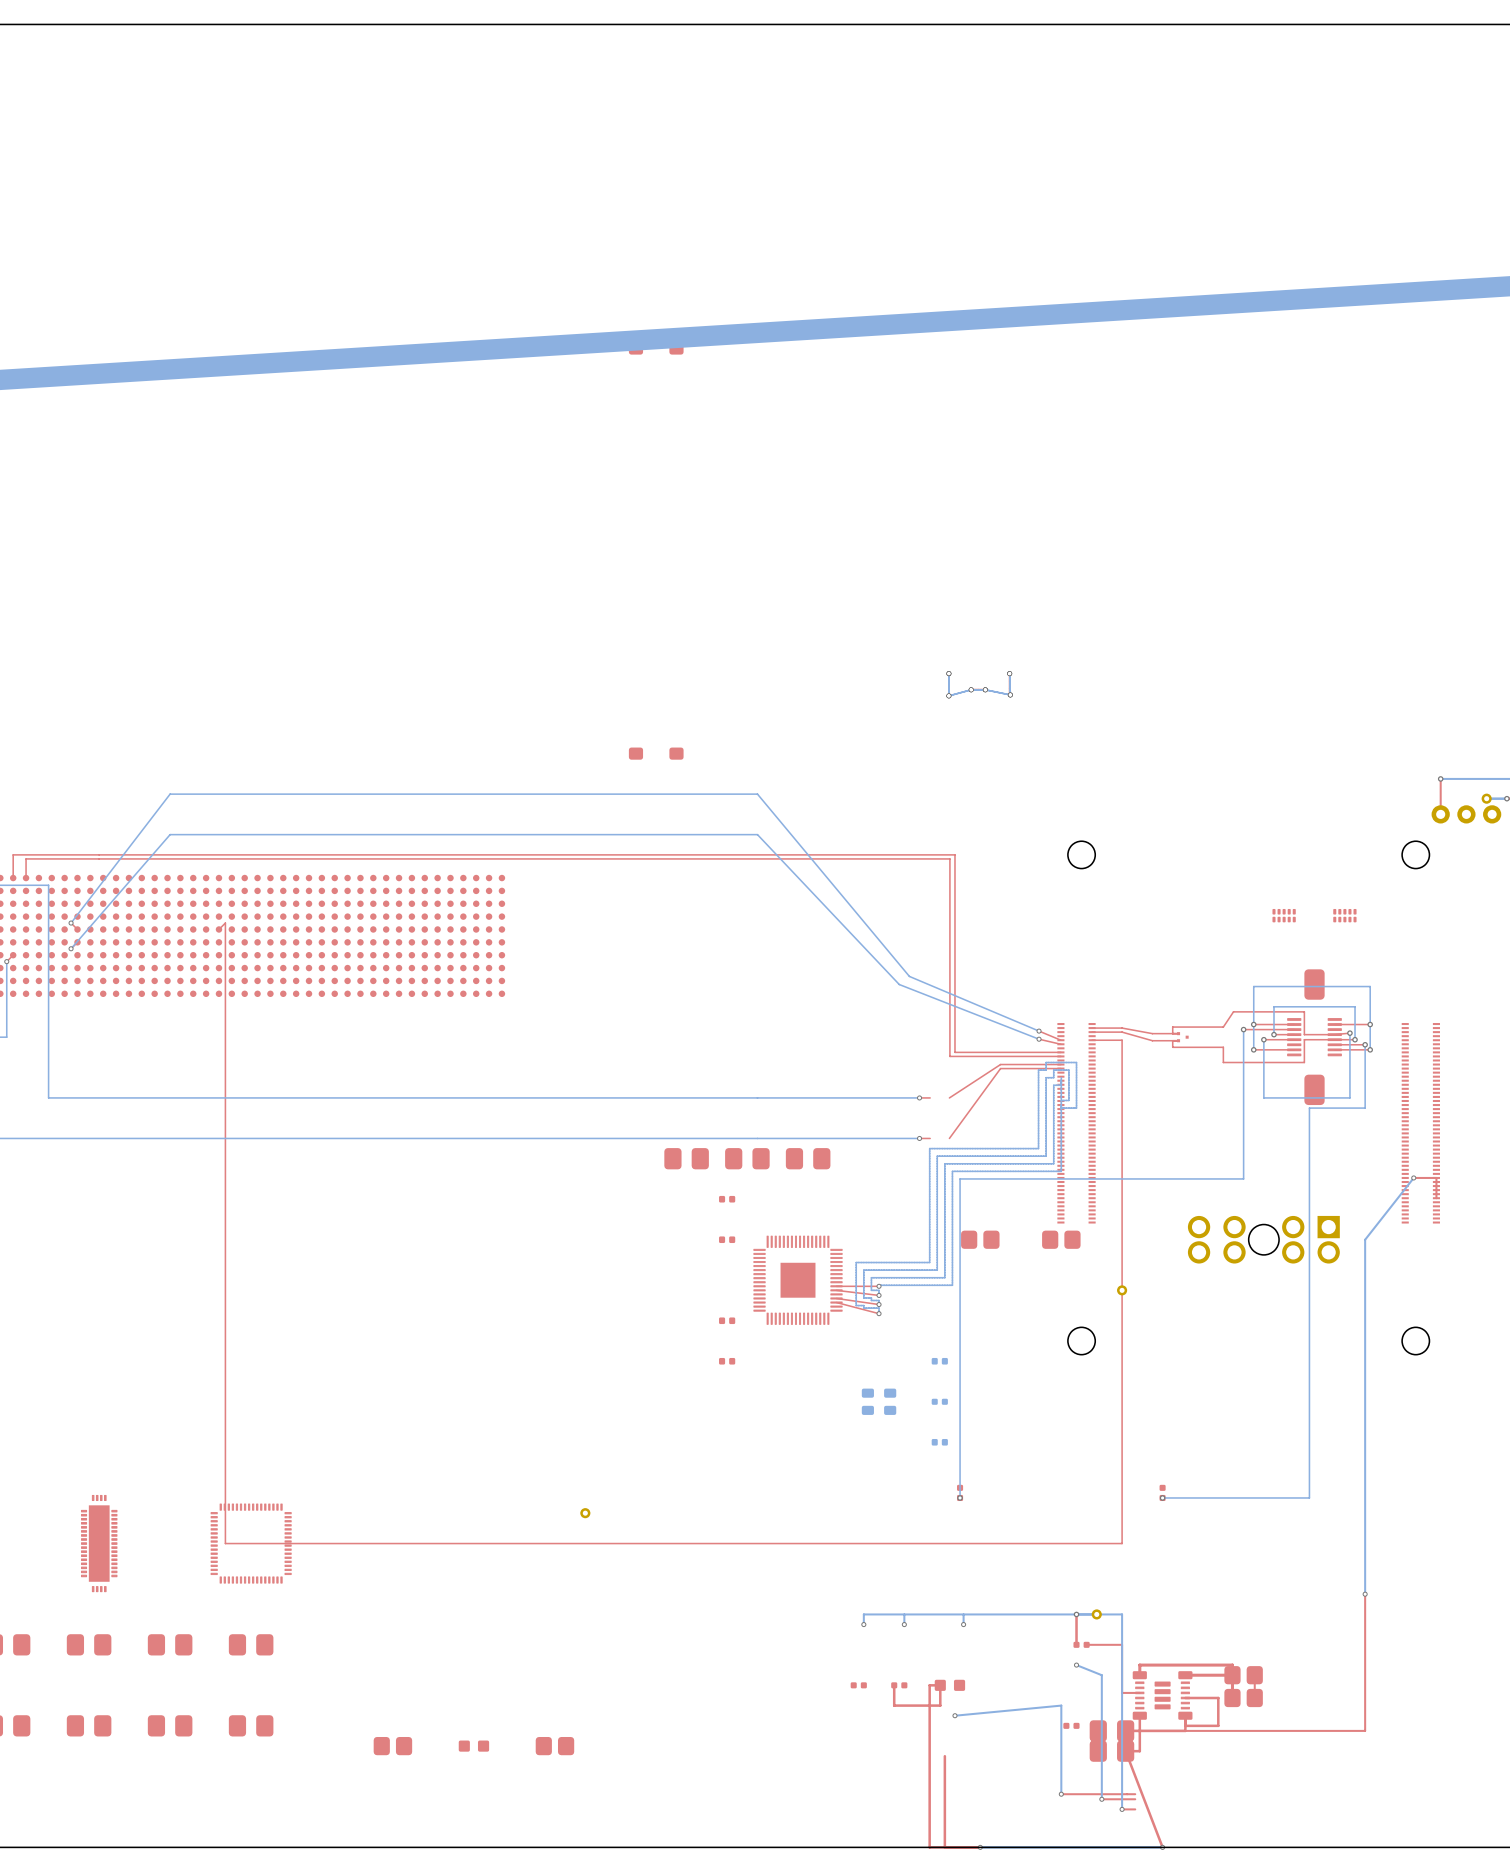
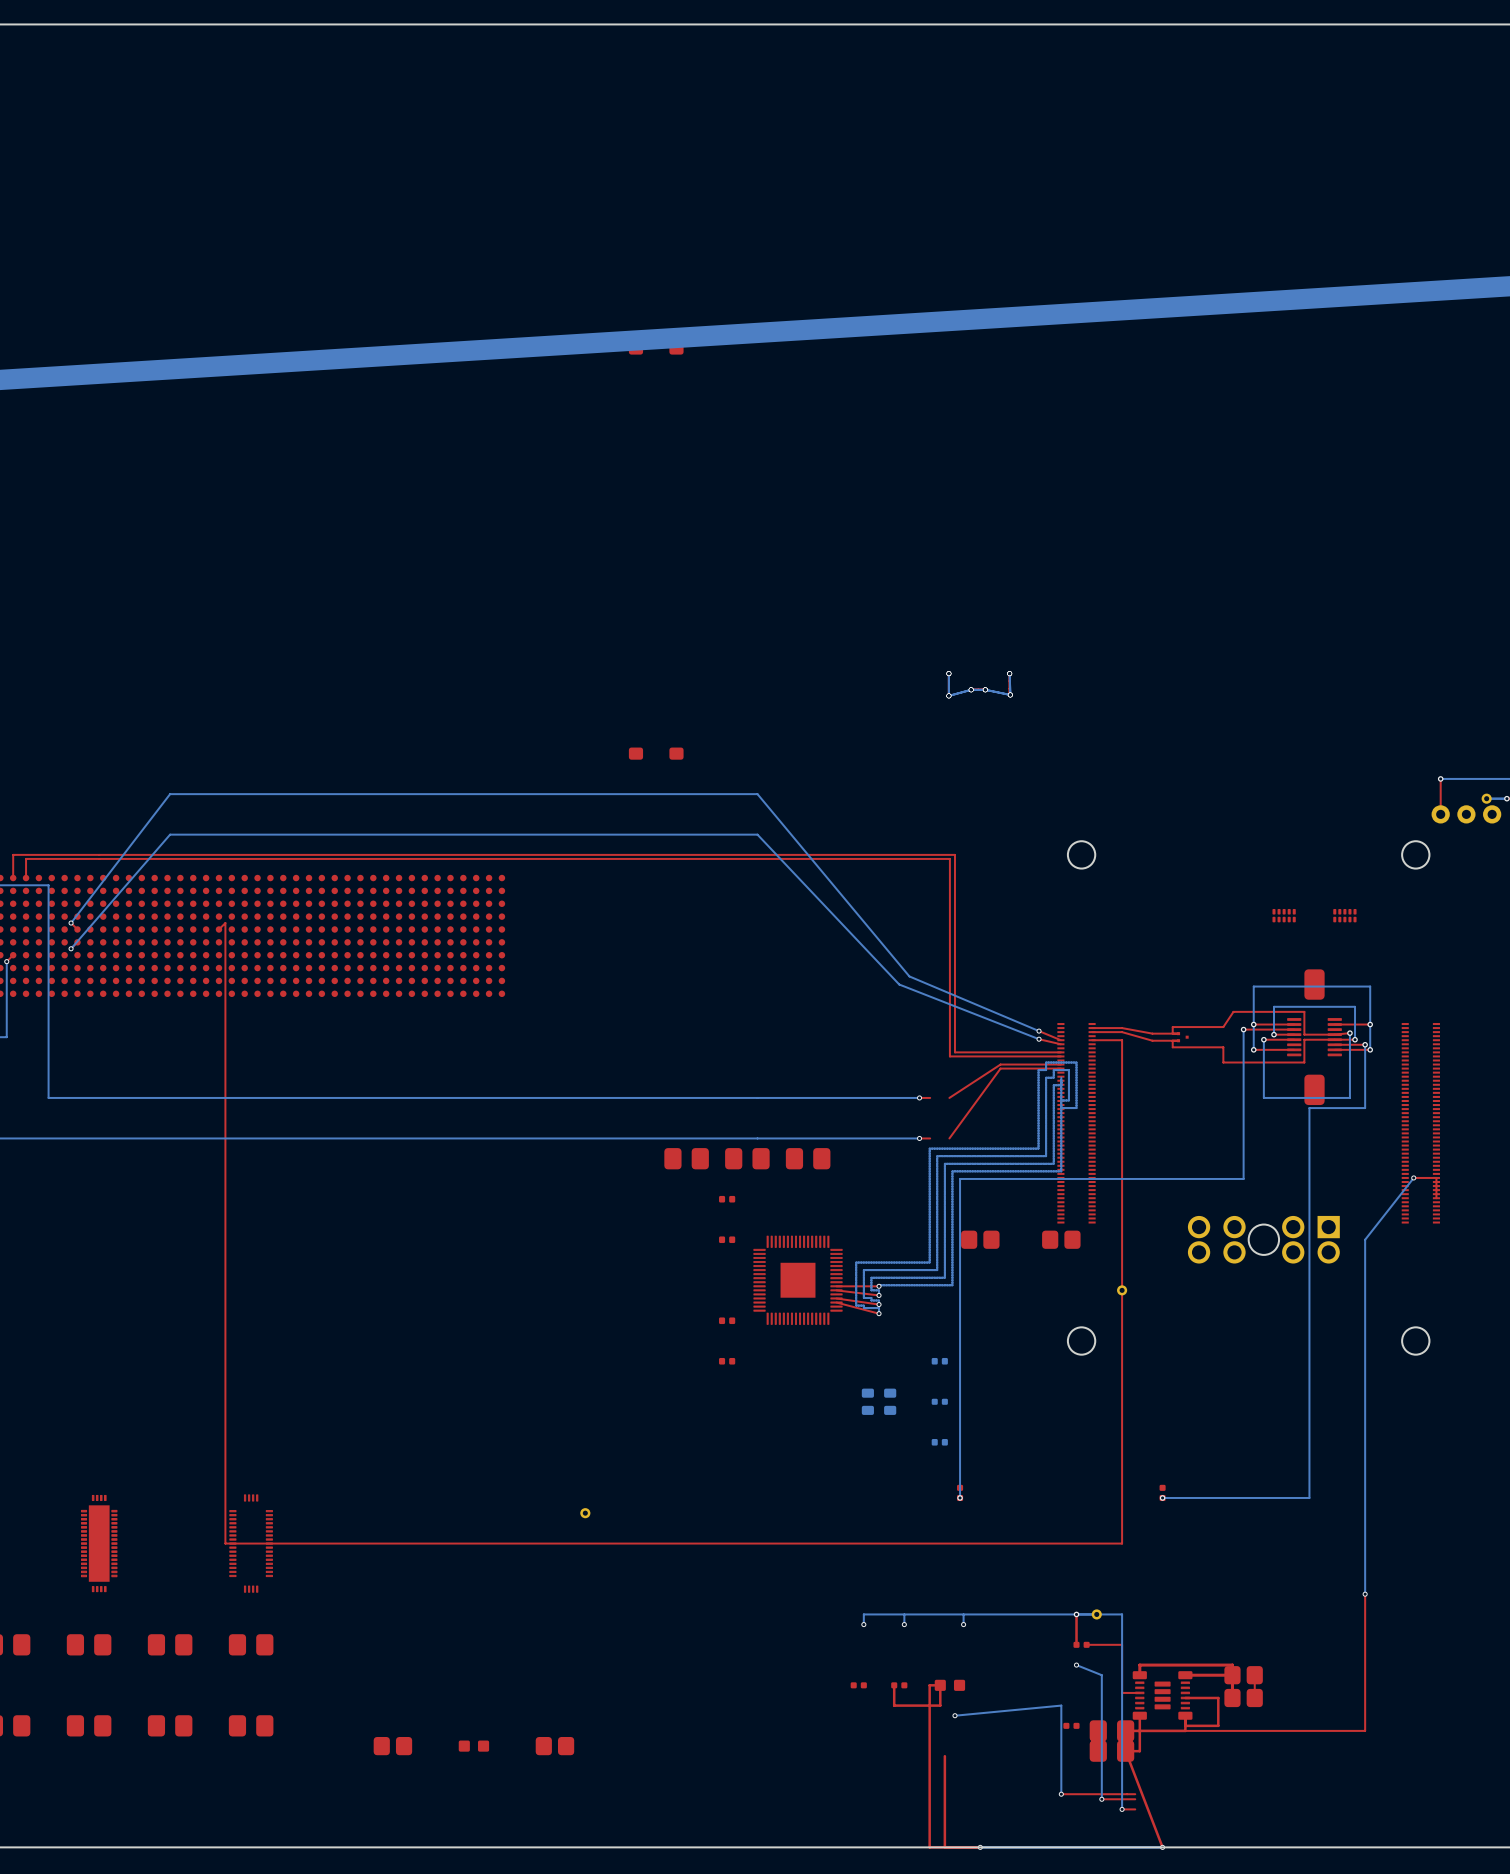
part footprint: [210, 1503, 292, 1584] -> [229, 1494, 273, 1593]

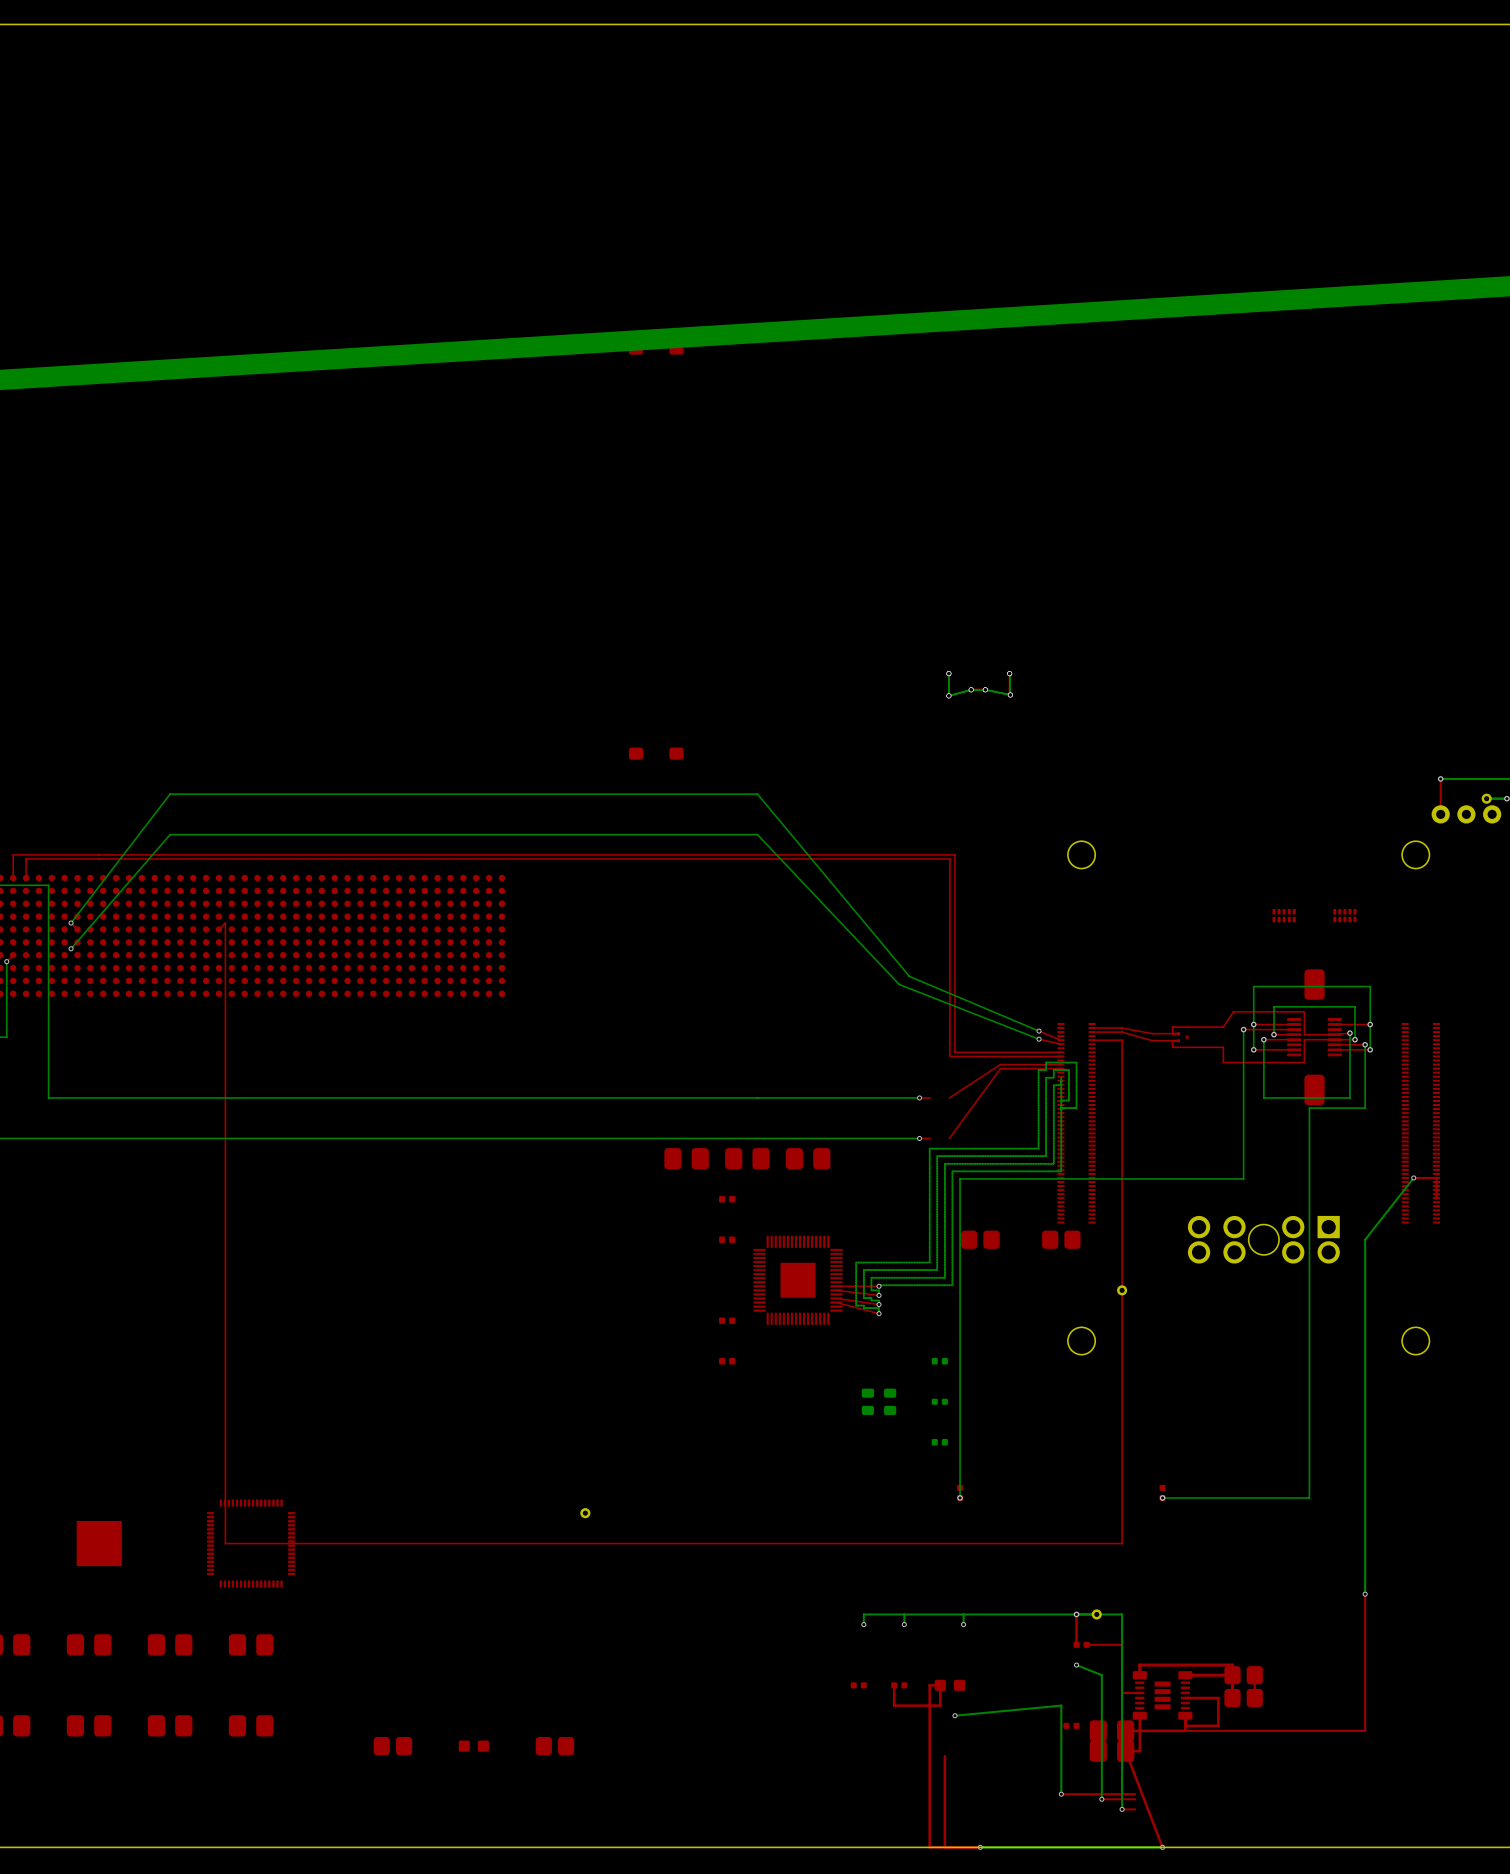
part footprint: [80, 1494, 118, 1593] -> [76, 1520, 122, 1567]
part footprint: [229, 1494, 273, 1593] -> [207, 1499, 296, 1588]

